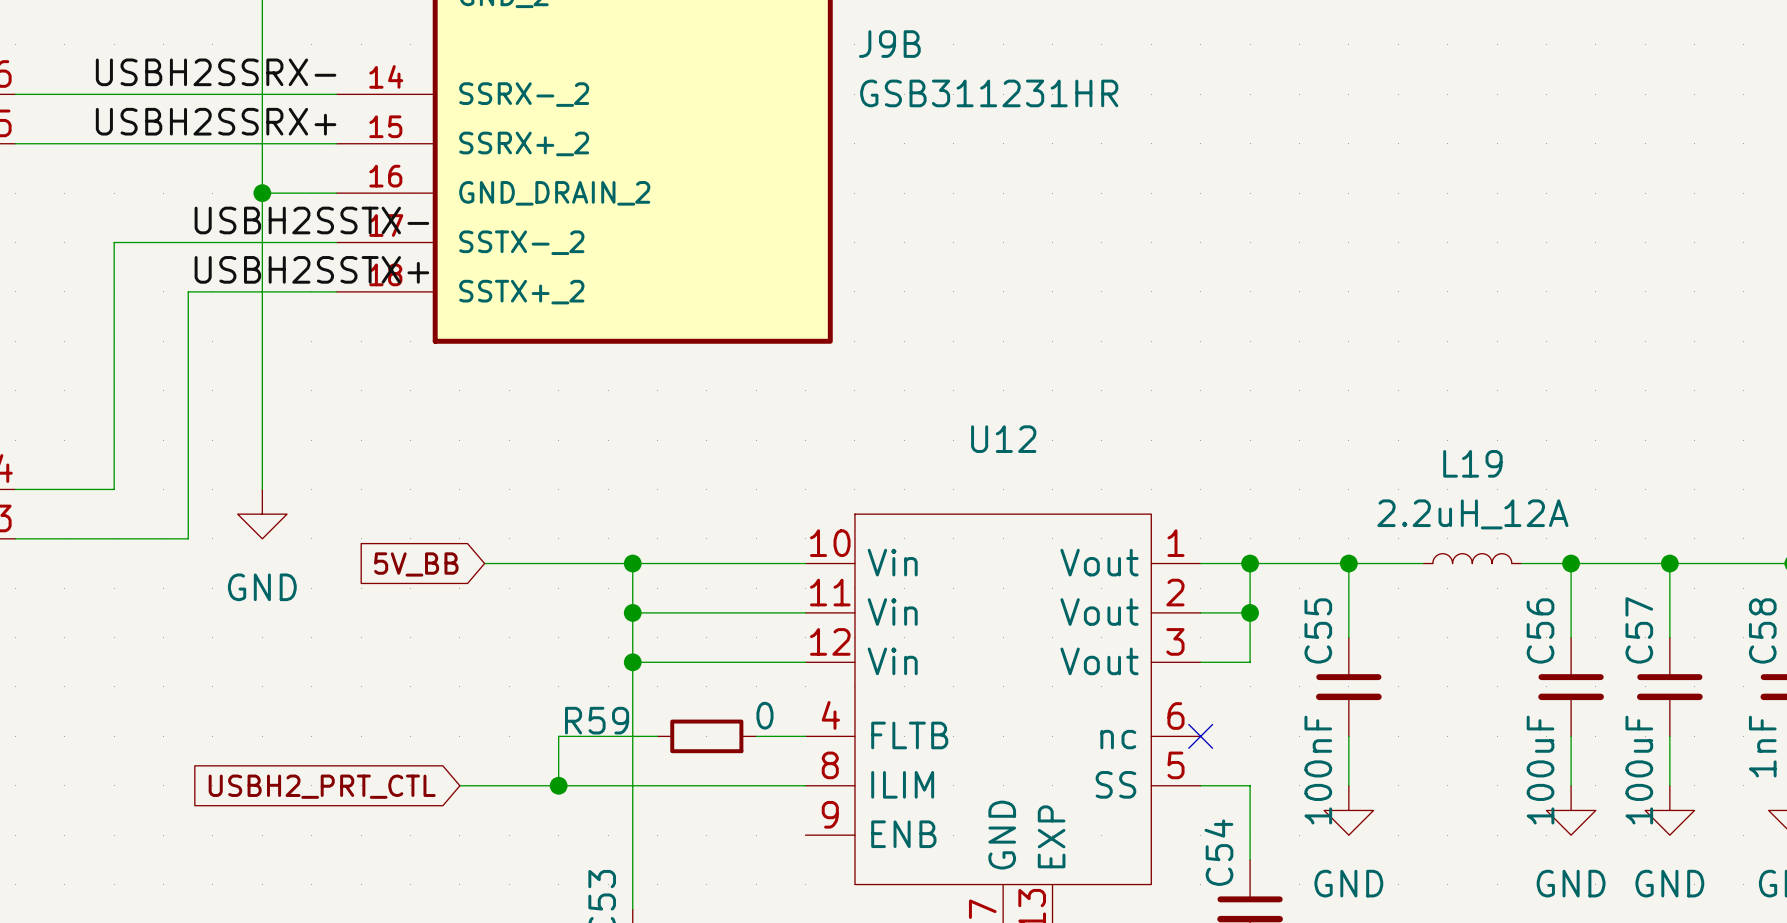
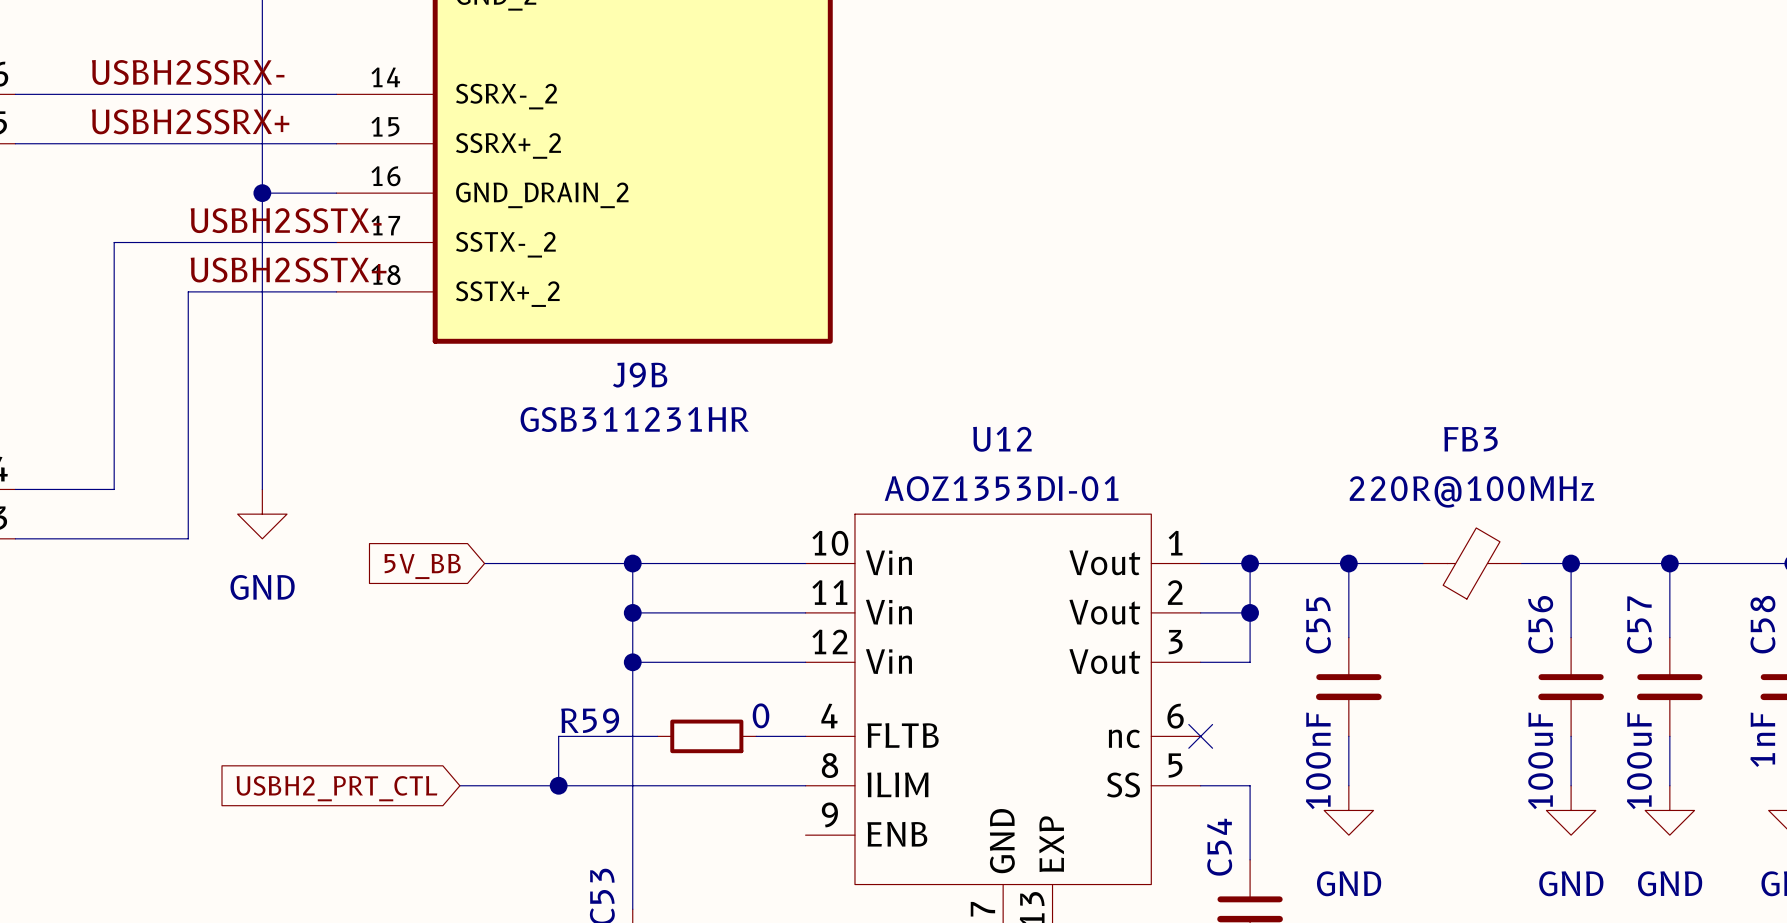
J9B name position: J9B (889, 44) -> J9B (640, 375)
J9B value position: GSB311231HR (989, 93) -> GSB311231HR (634, 419)
U12 value: none -> AOZ1353DI-01 (1001, 488)
L19: 2.2uH_12A (1472, 558) -> none
FB3: none -> 220R@100MHz (1472, 563)

